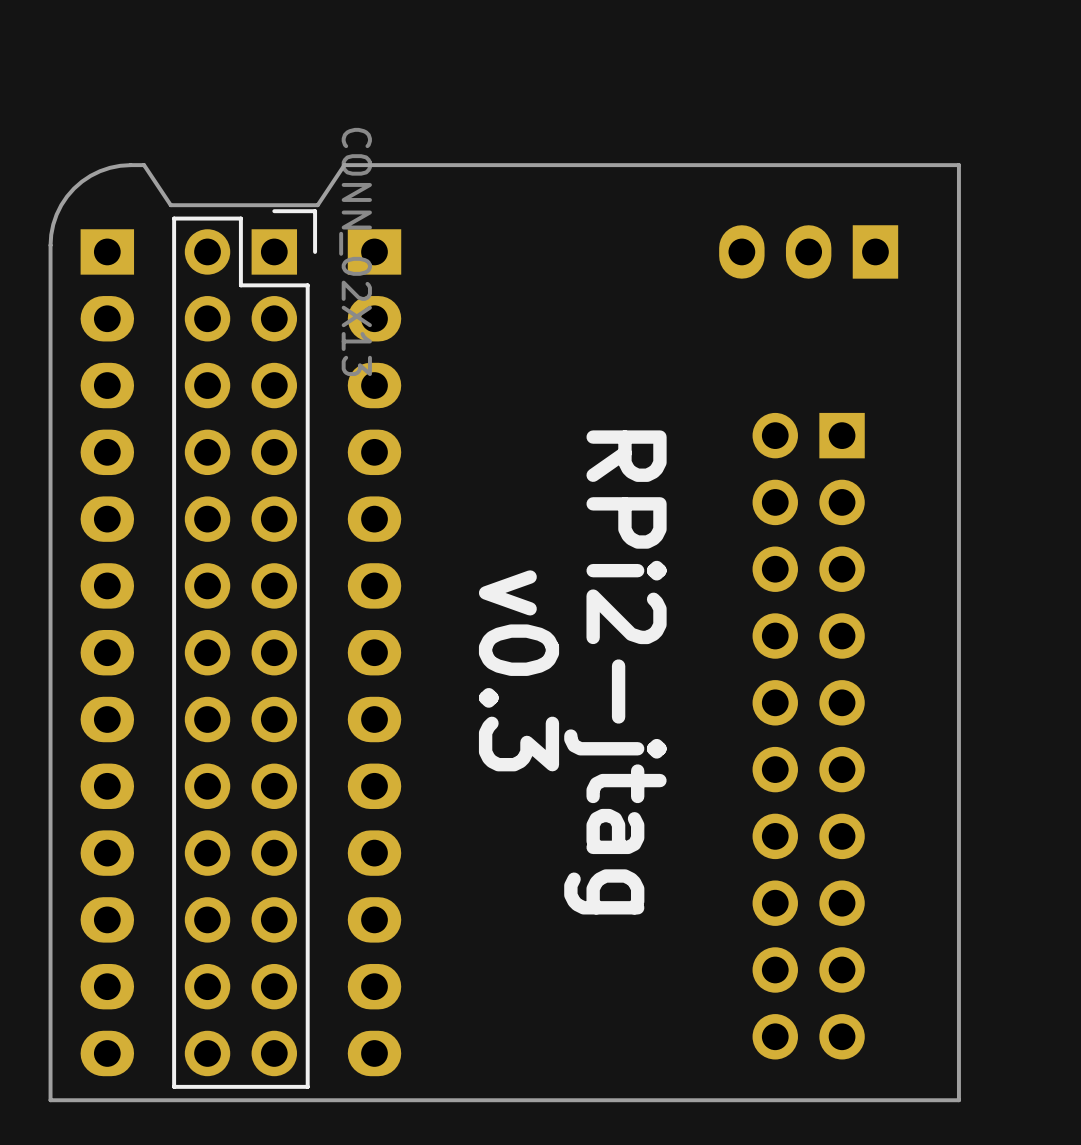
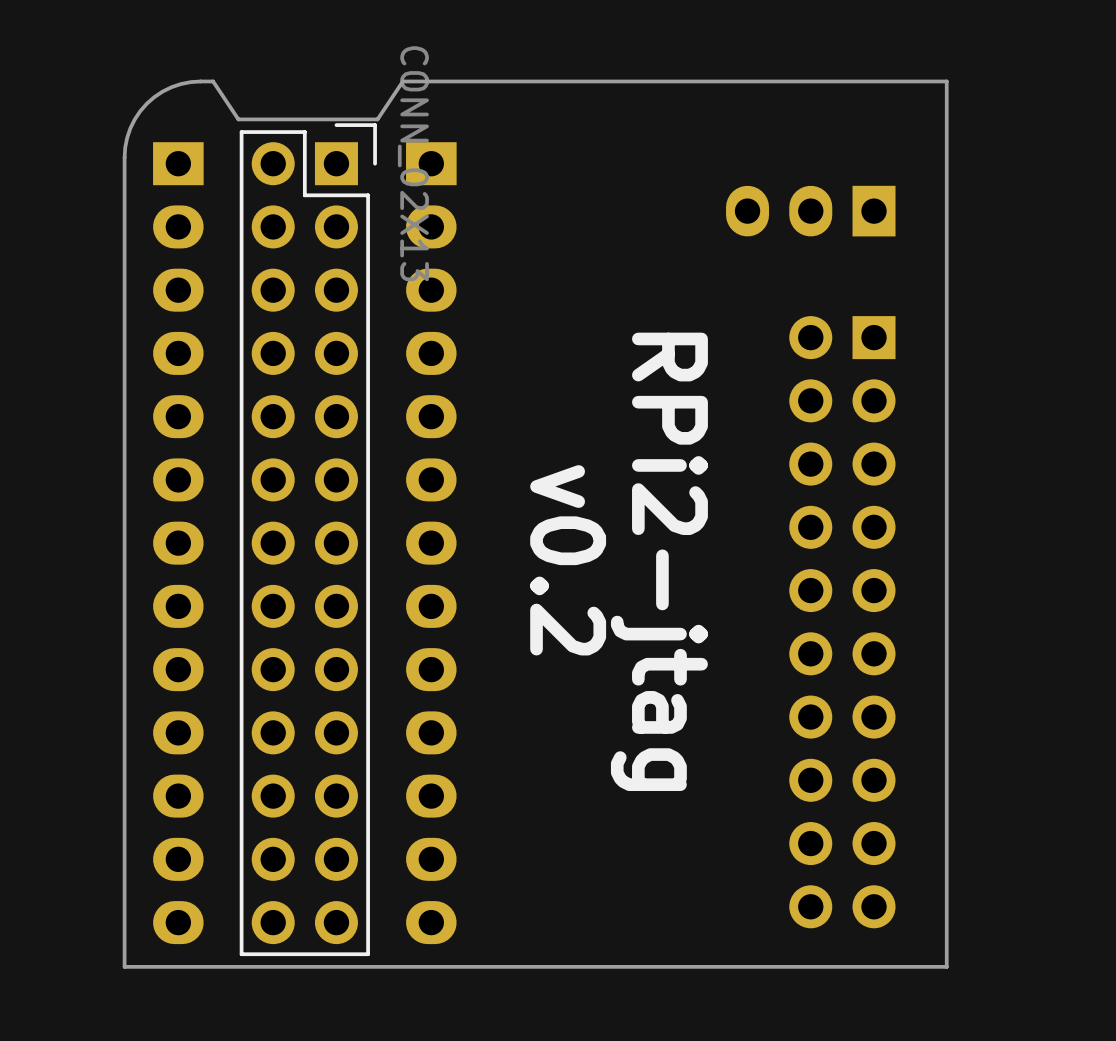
board edge: (918, 165) (958, 165) (958, 1100) (918, 1100) -> (946, 81) (946, 966)
part position: (808, 251) -> (810, 211)
text: v0.3 (519, 670) -> v0.2 (568, 560)

